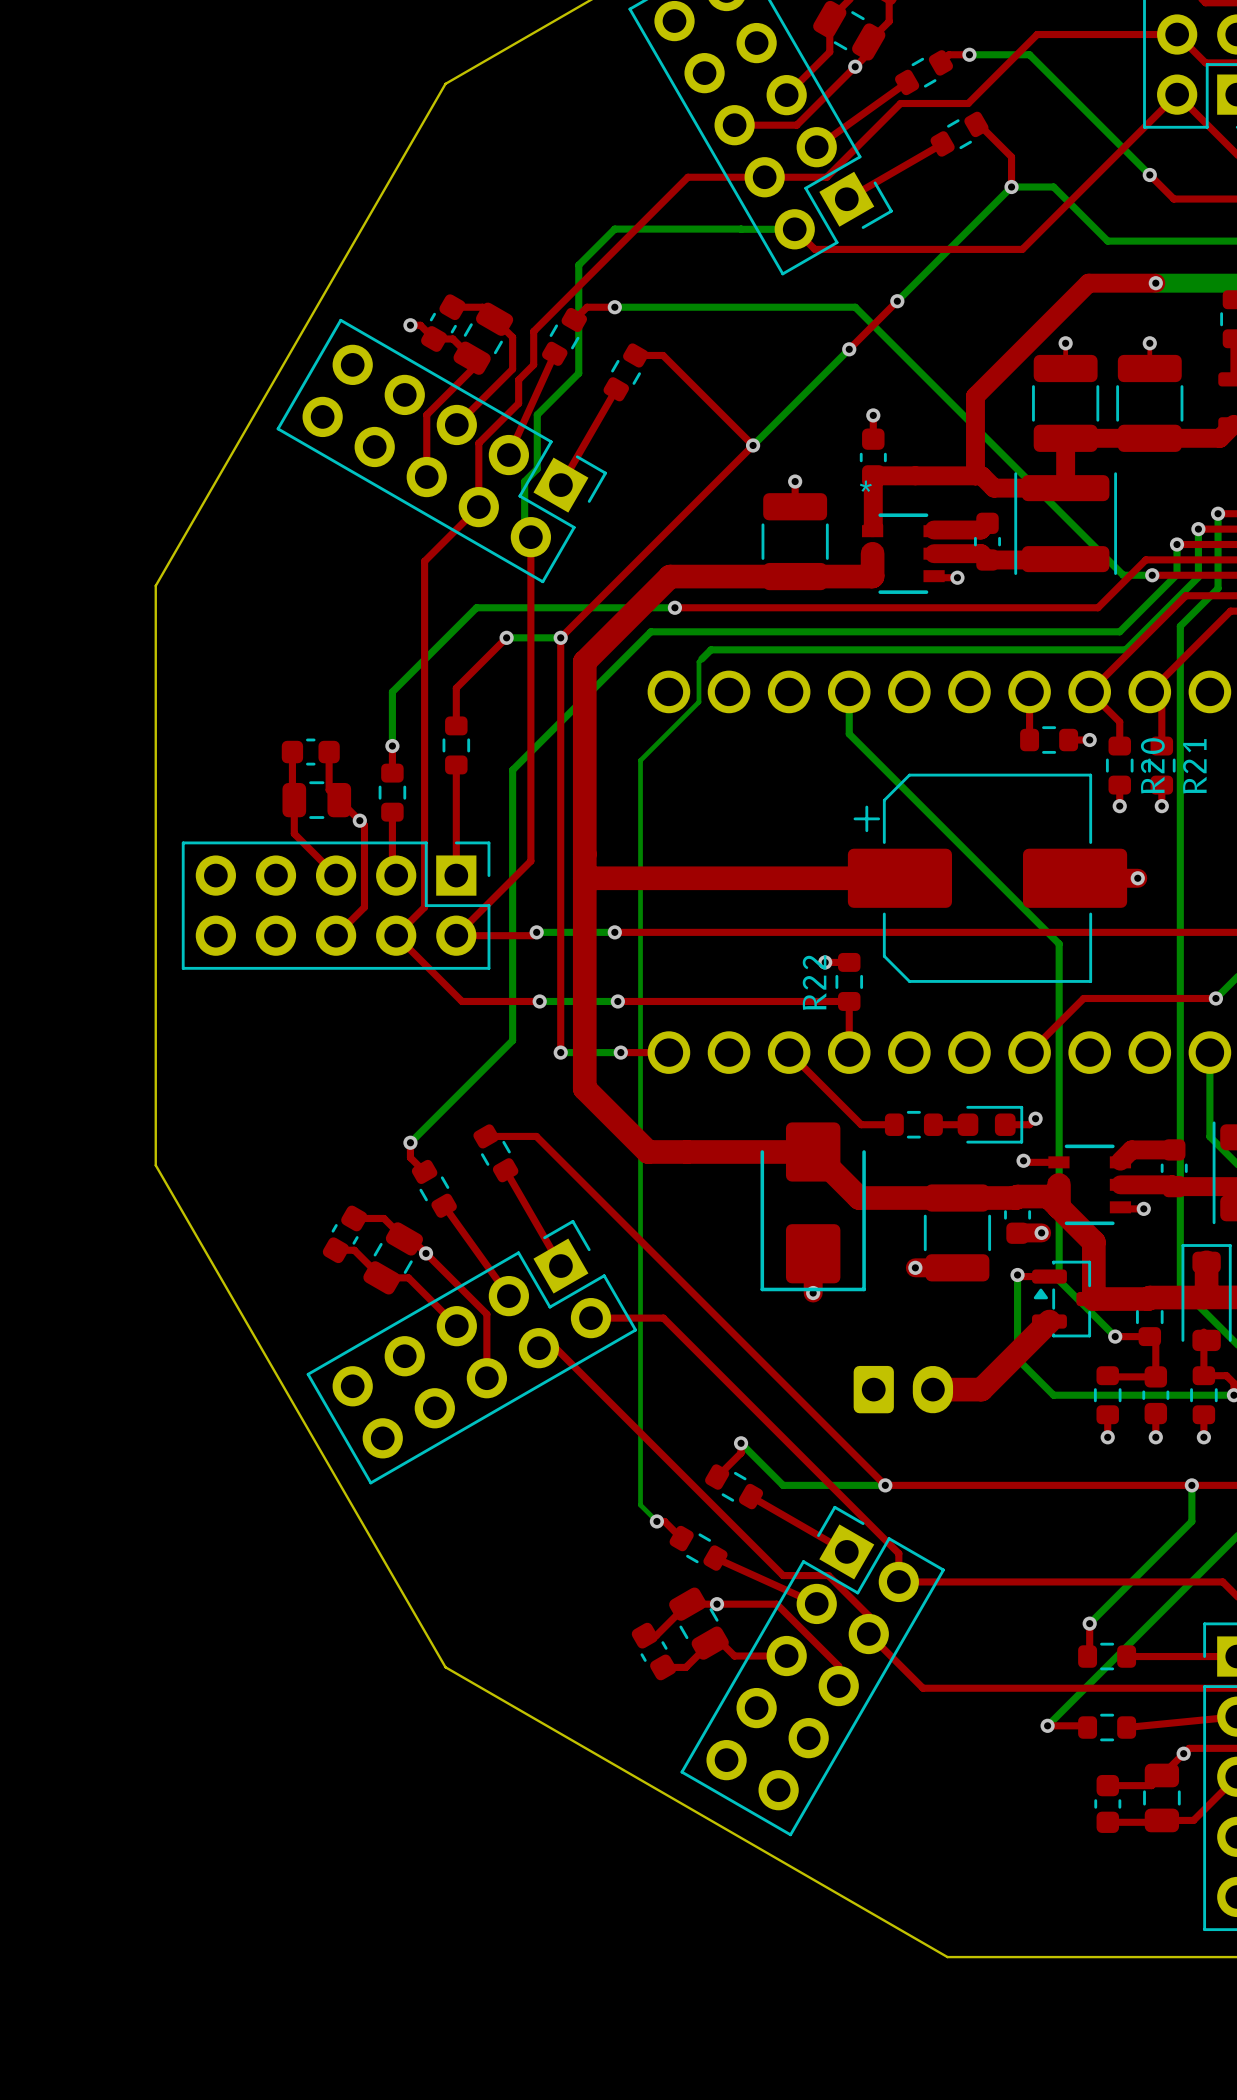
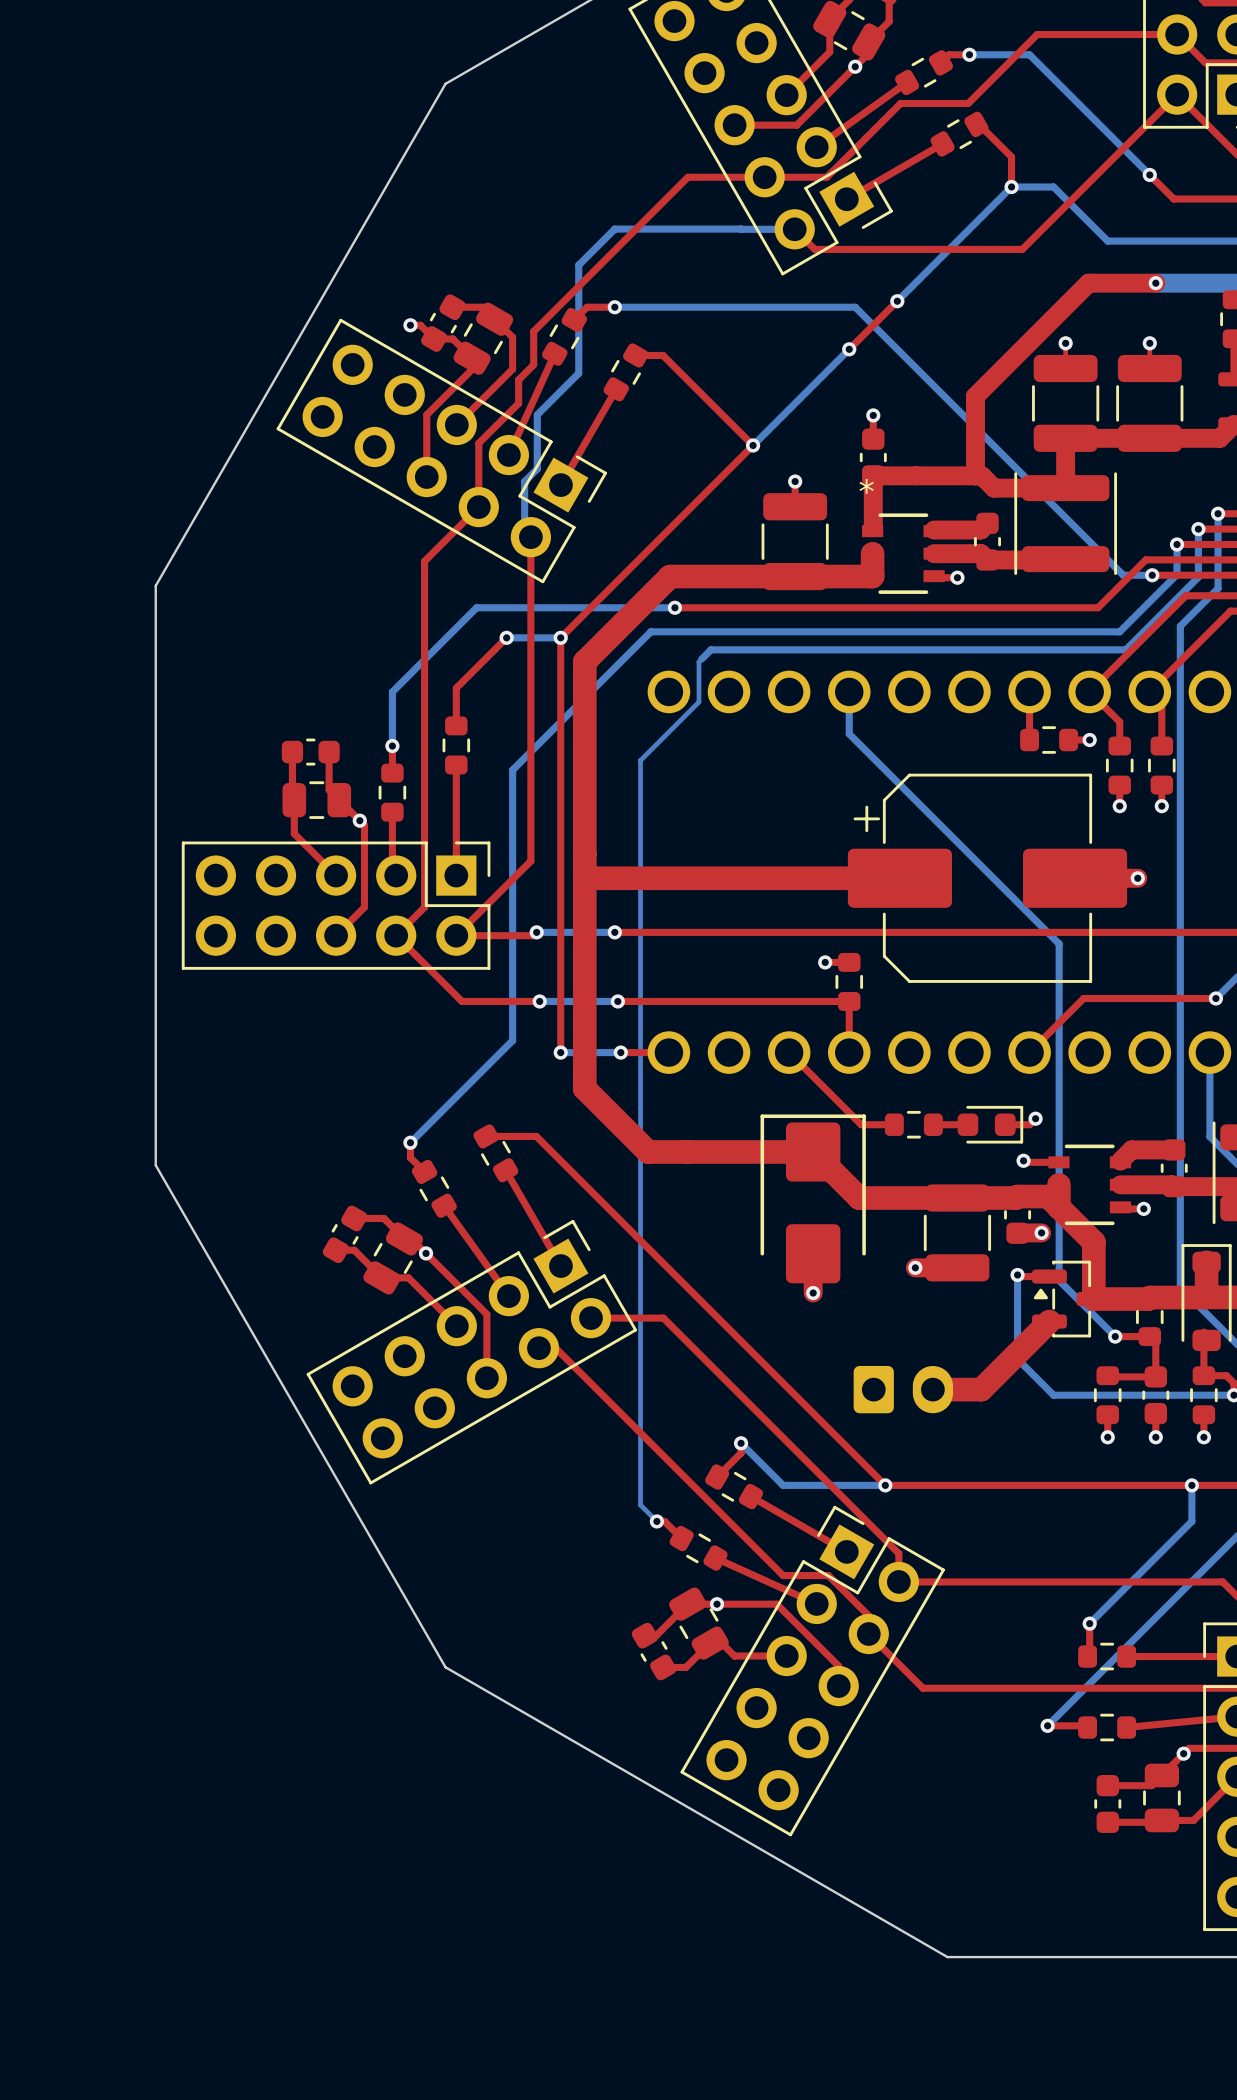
R20 name: R20 (1152, 765) -> none
R21 name: R21 (1194, 766) -> none
R22 name: R22 (814, 982) -> none
part rotation: 0° (813, 1206) -> 180° (813, 1198)

